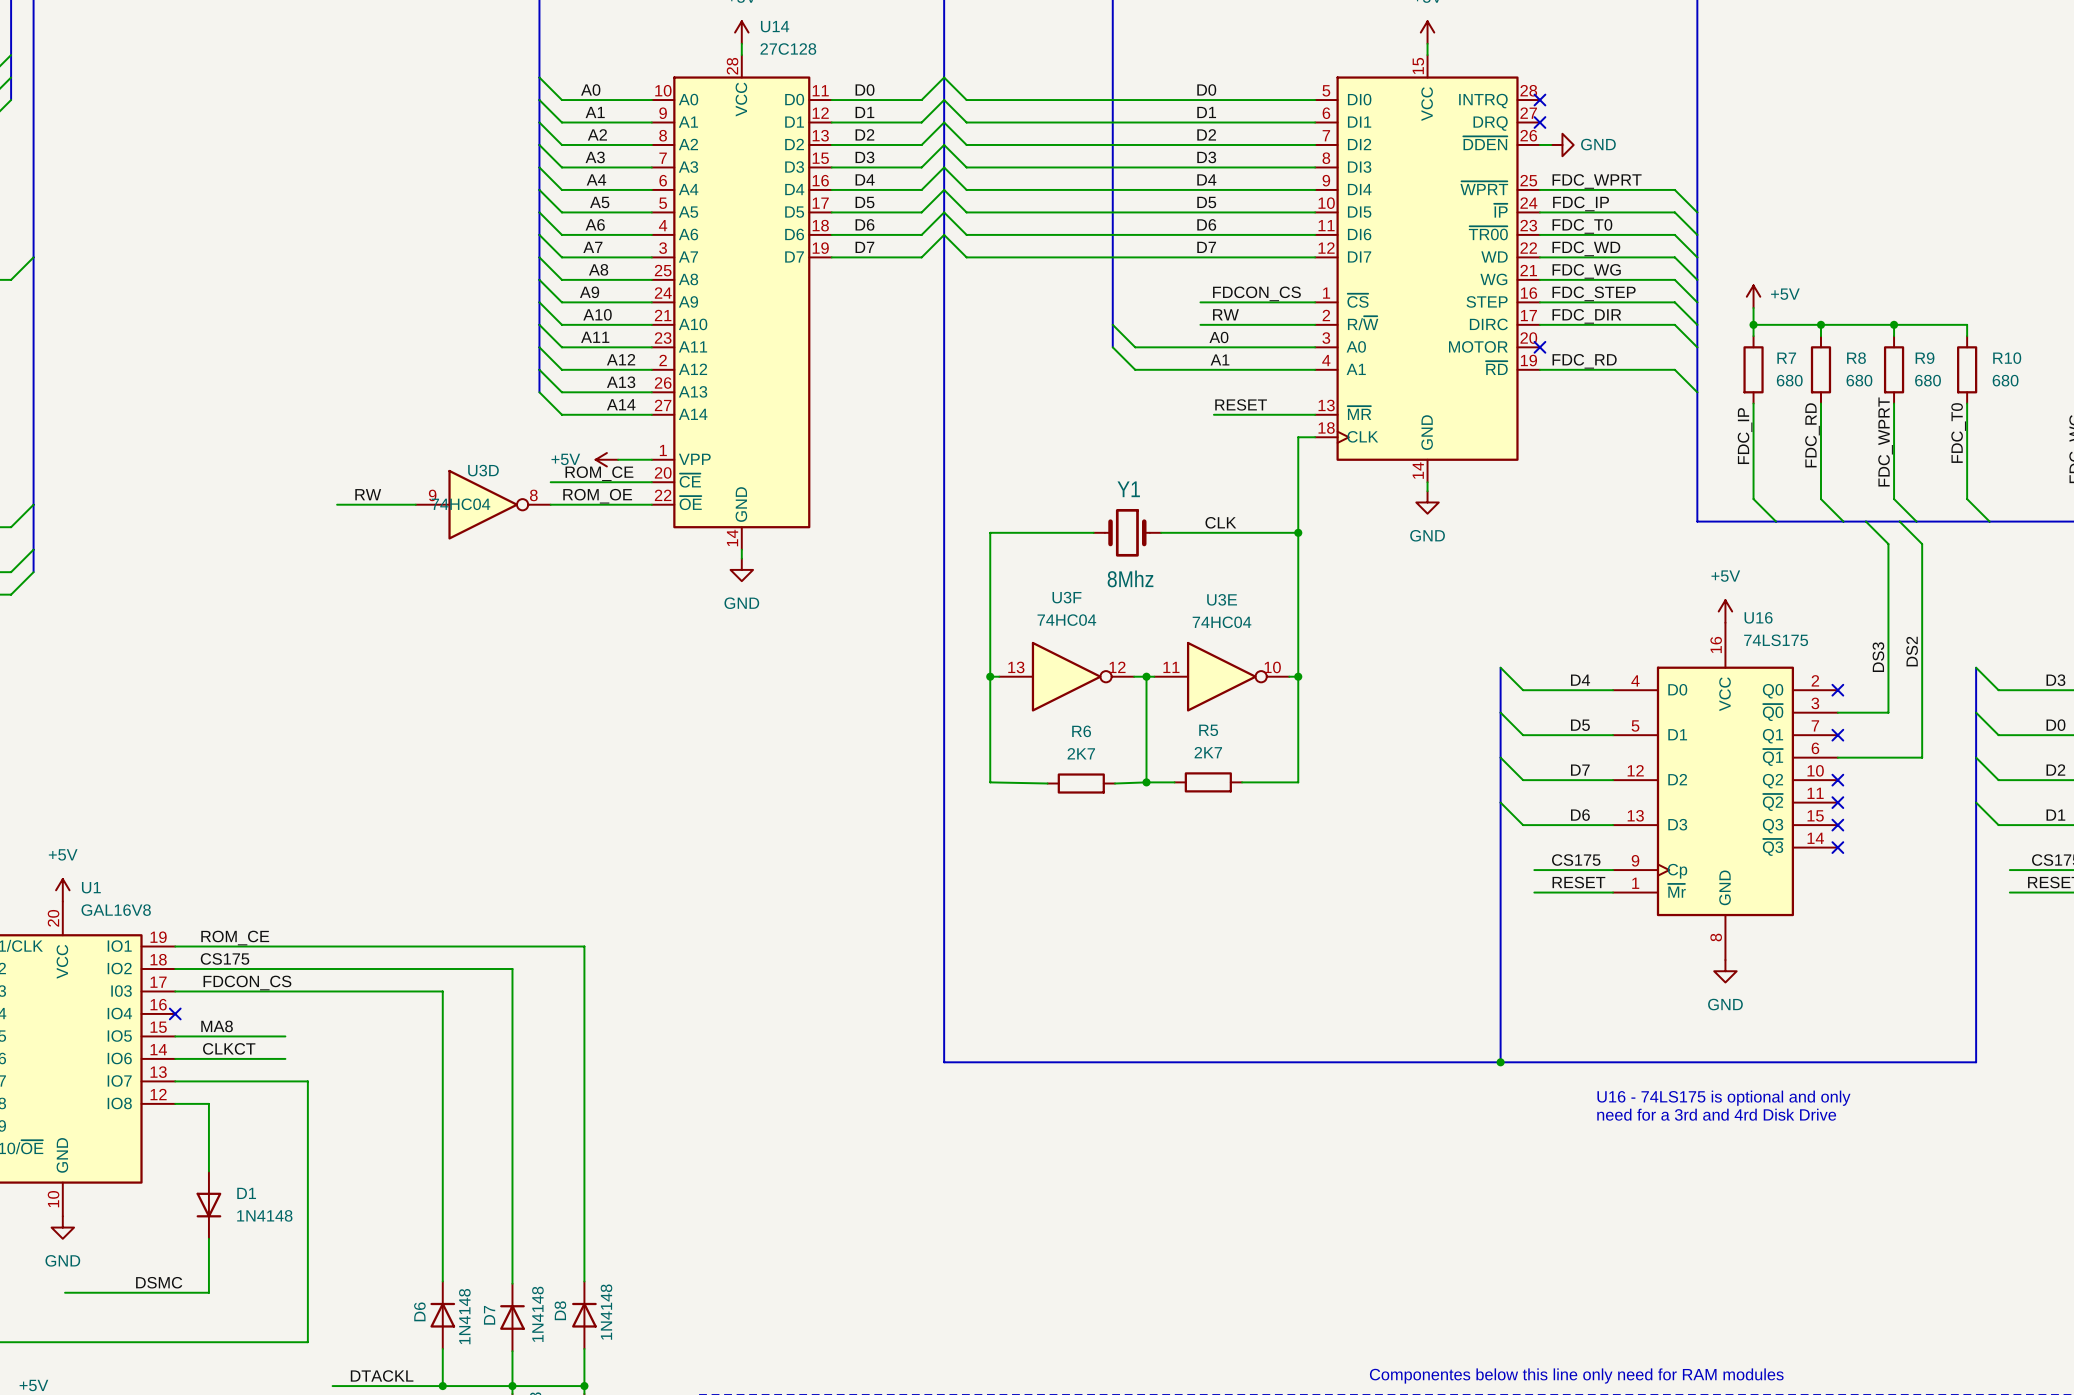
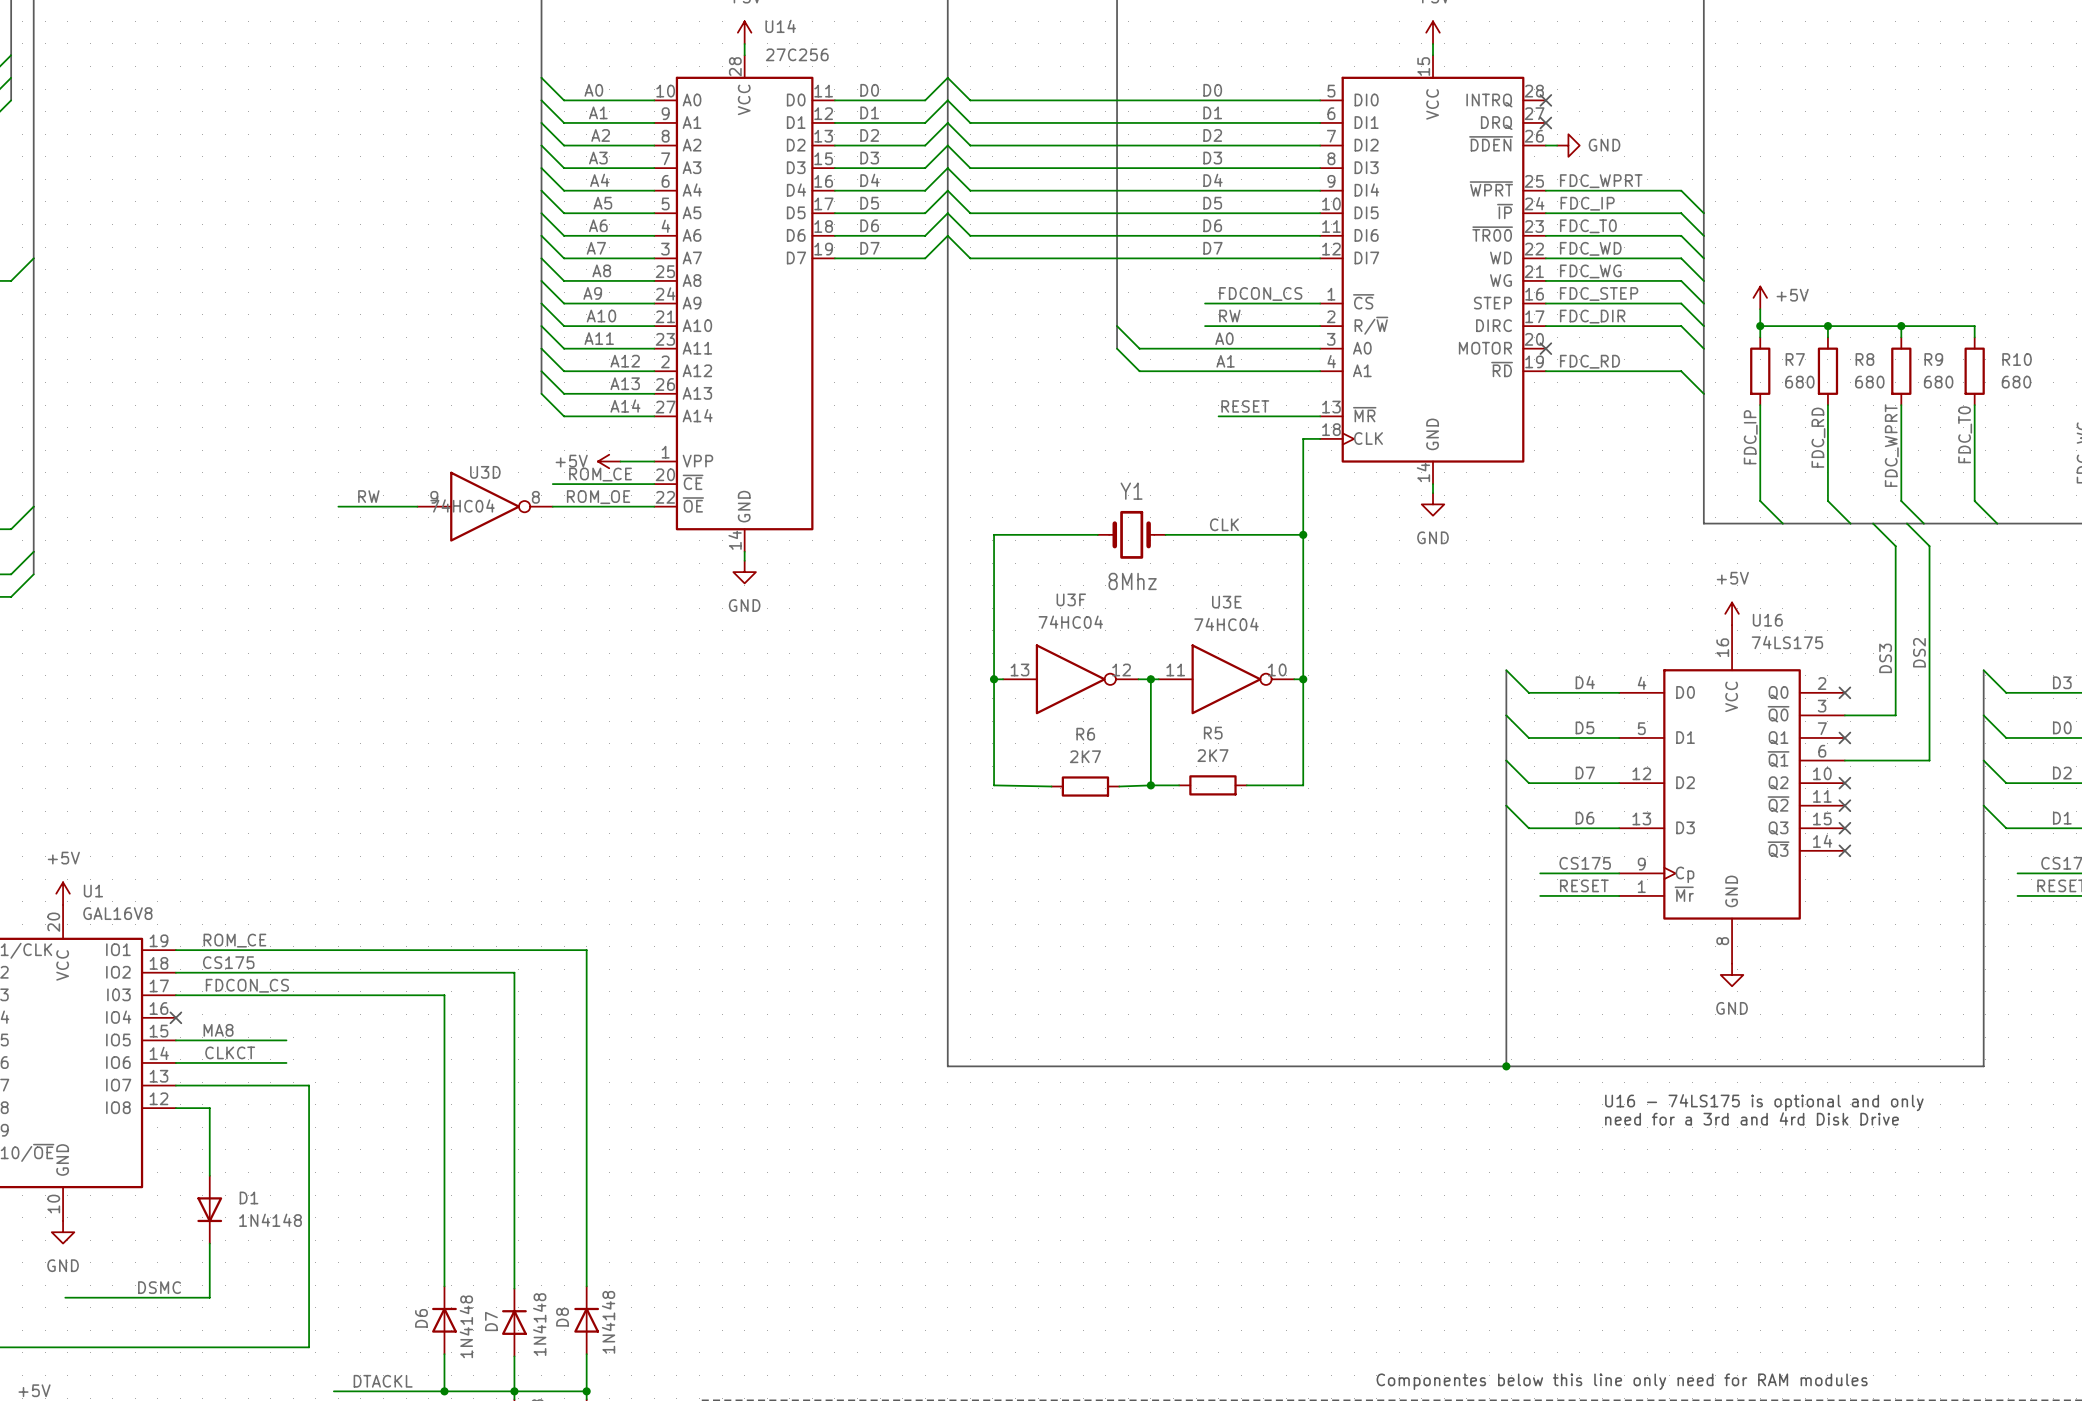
U14 value: 27C128 (788, 49) -> 27C256 (797, 54)

